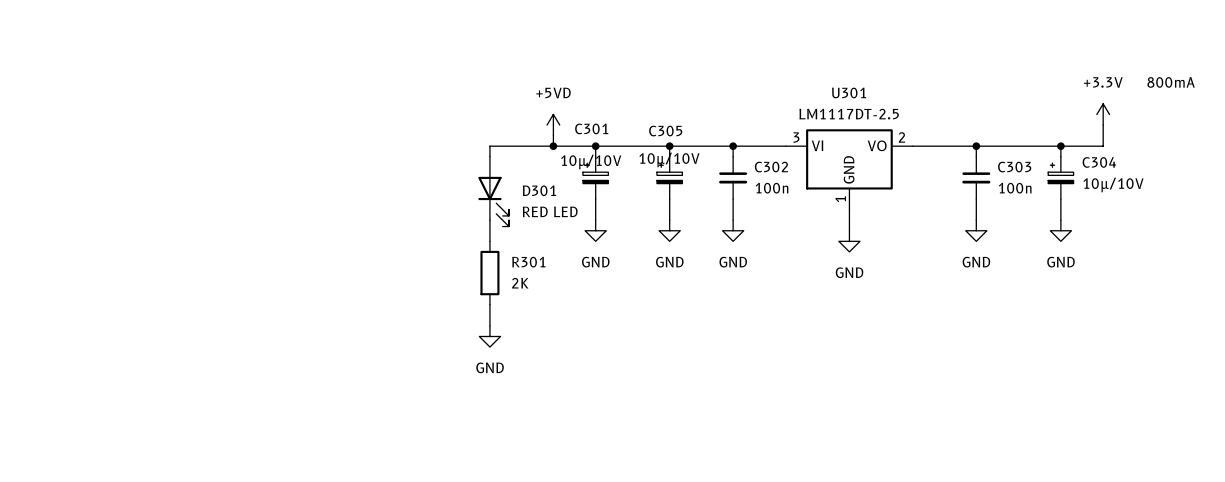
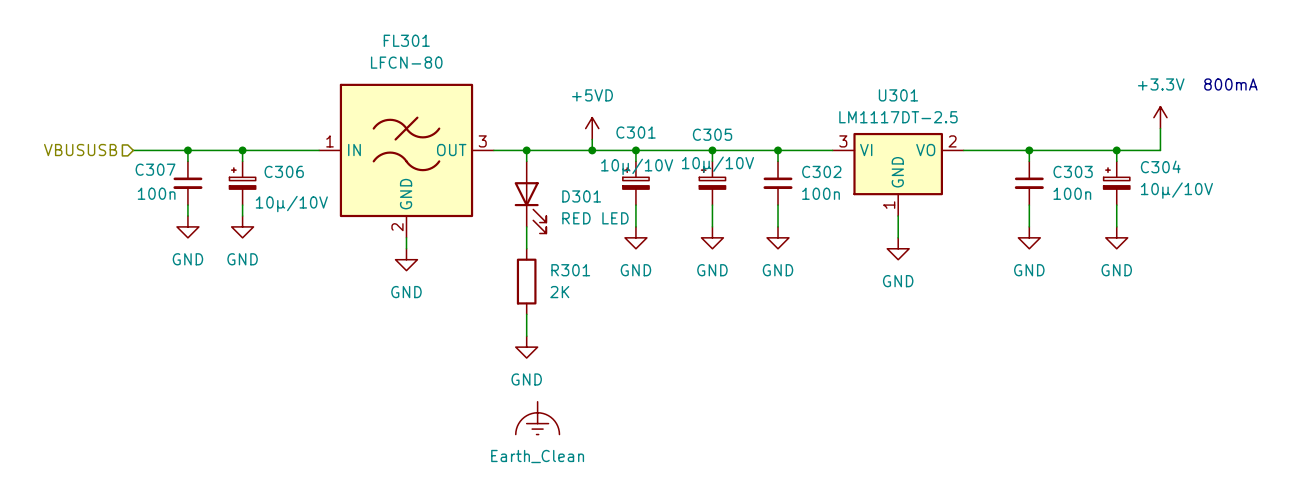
hierarchical label: none -> VBUSUSB (80, 150)
wire: none -> (133, 150) (319, 150)
wire: none -> (187, 150) (187, 161)
junction: none -> (187, 150)
wire: none -> (242, 150) (242, 161)
junction: none -> (242, 150)
wire: none -> (493, 150) (526, 150)
junction: none -> (526, 150)
FL301: none -> LFCN-80 (406, 160)
C307: none -> 100n (187, 183)
C306: none -> 10µ/10V (242, 183)
wire: none -> (187, 205) (187, 216)
wire: none -> (242, 205) (242, 216)
power symbol: none -> GND (187, 226)
power symbol: none -> GND (242, 226)
wire: none -> (406, 237) (406, 248)
power symbol: none -> GND (406, 259)
power symbol: none -> Earth_Clean (537, 418)

